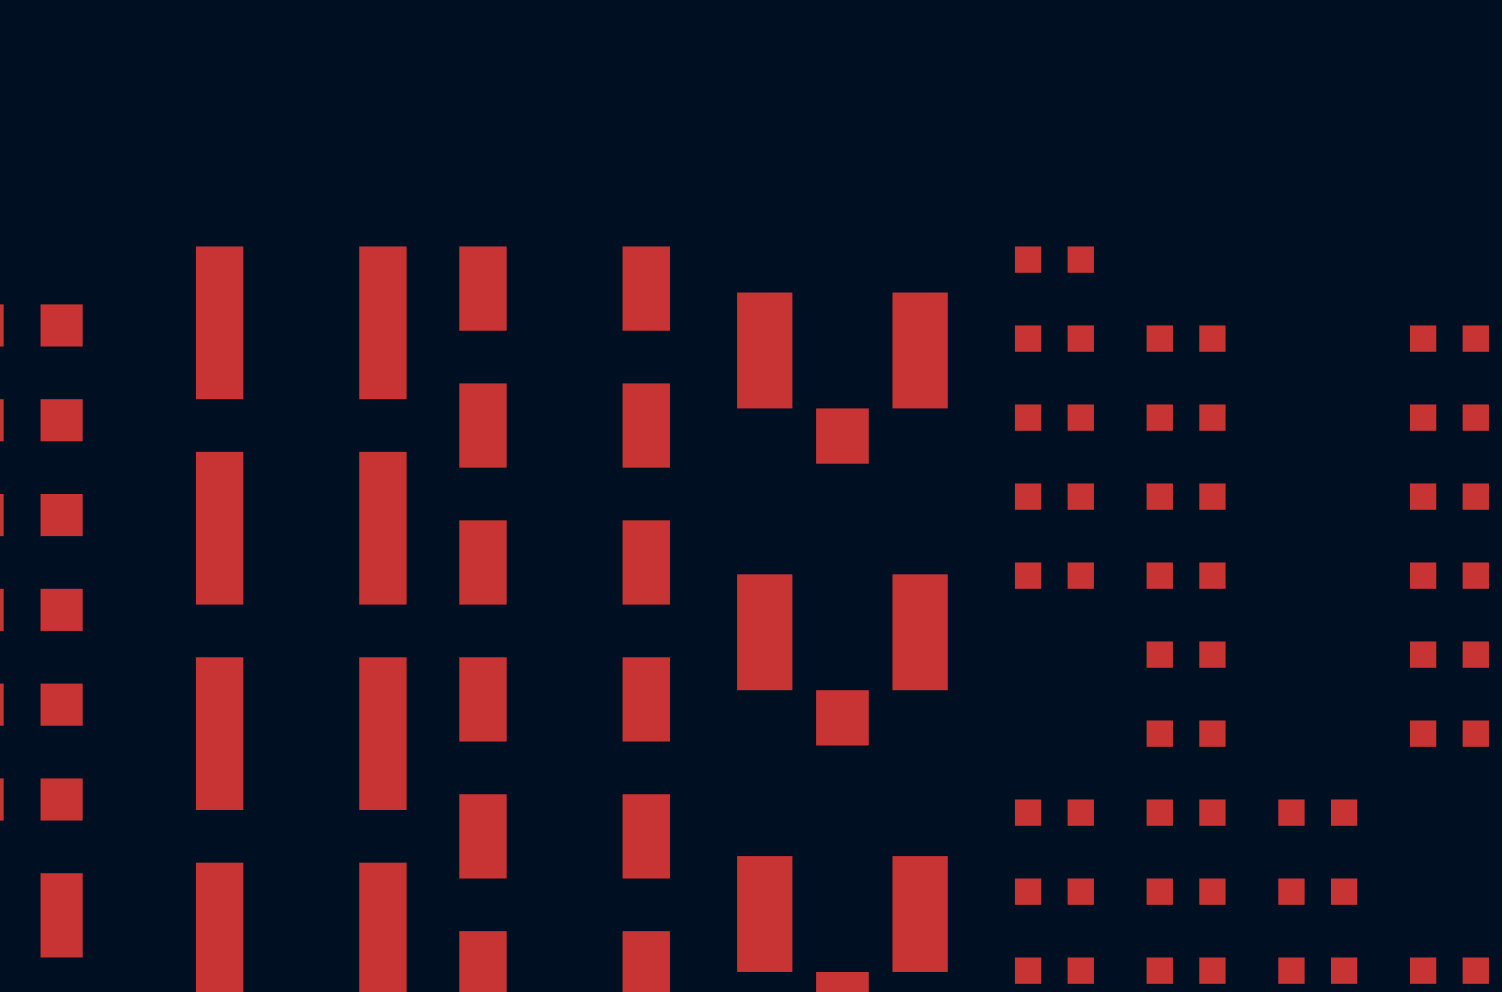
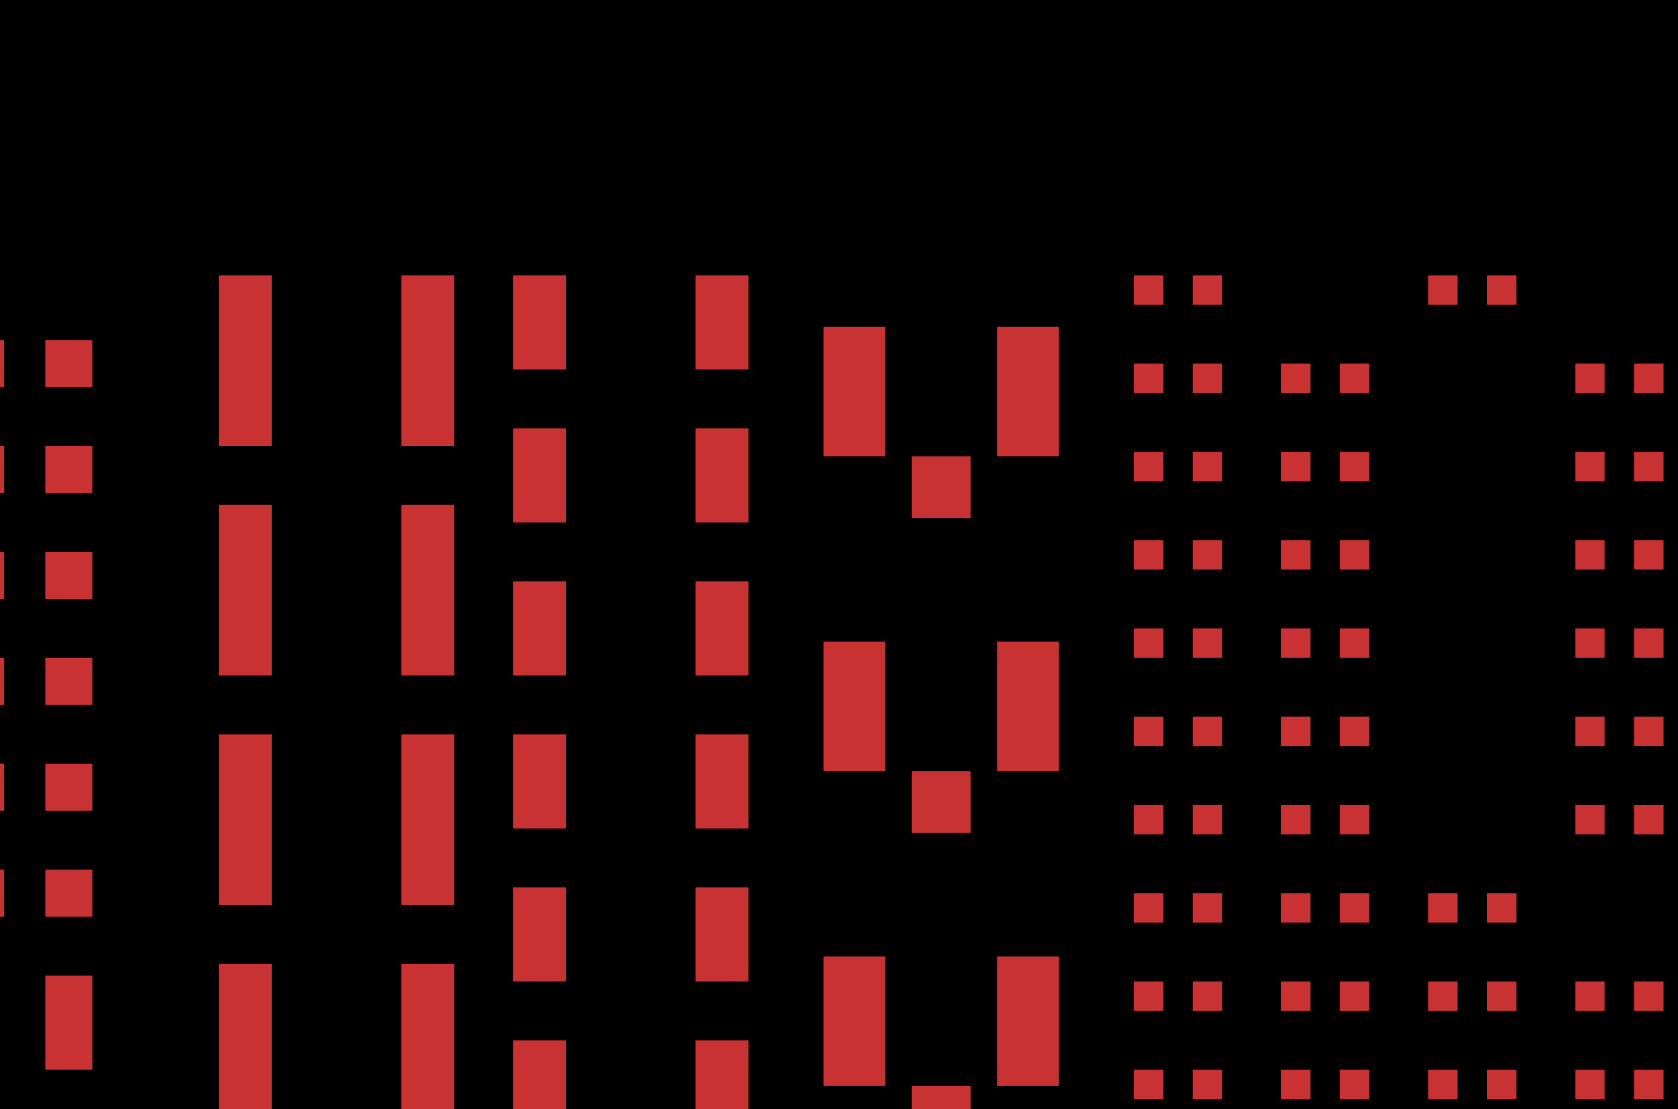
part: none -> (1472, 290)
part: none -> (1178, 731)
part: none -> (1178, 819)
part: none -> (1619, 996)

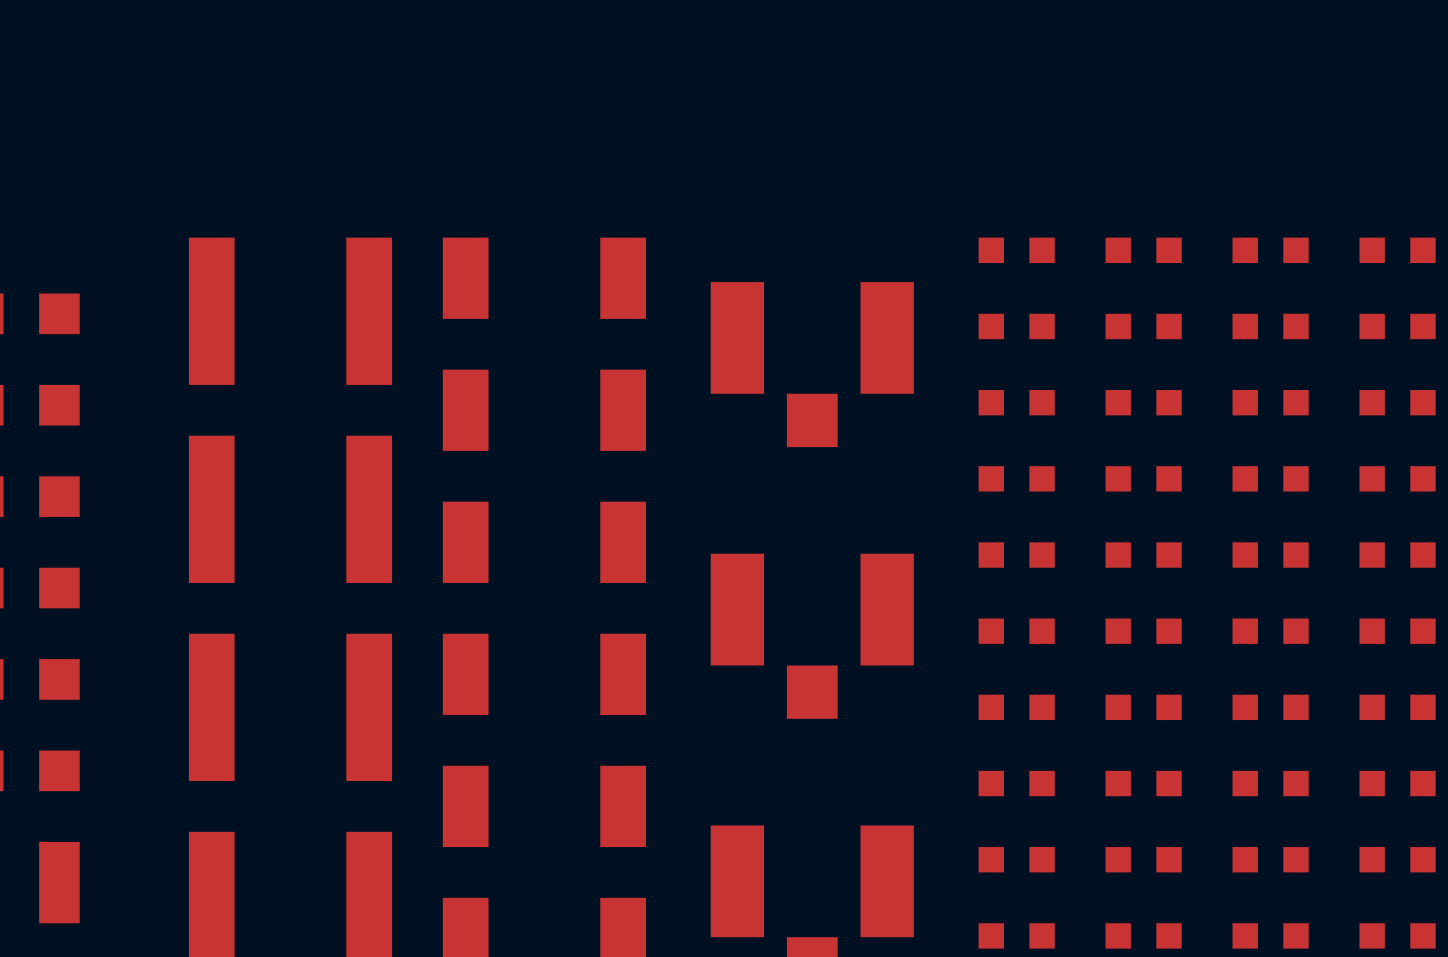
part: none -> (1143, 250)
part: none -> (1397, 250)
part: none -> (1270, 326)
part: none -> (1270, 402)
part: none -> (1270, 478)
part: none -> (1270, 555)
part: none -> (1270, 631)
part: none -> (1270, 707)
part: none -> (1397, 783)

